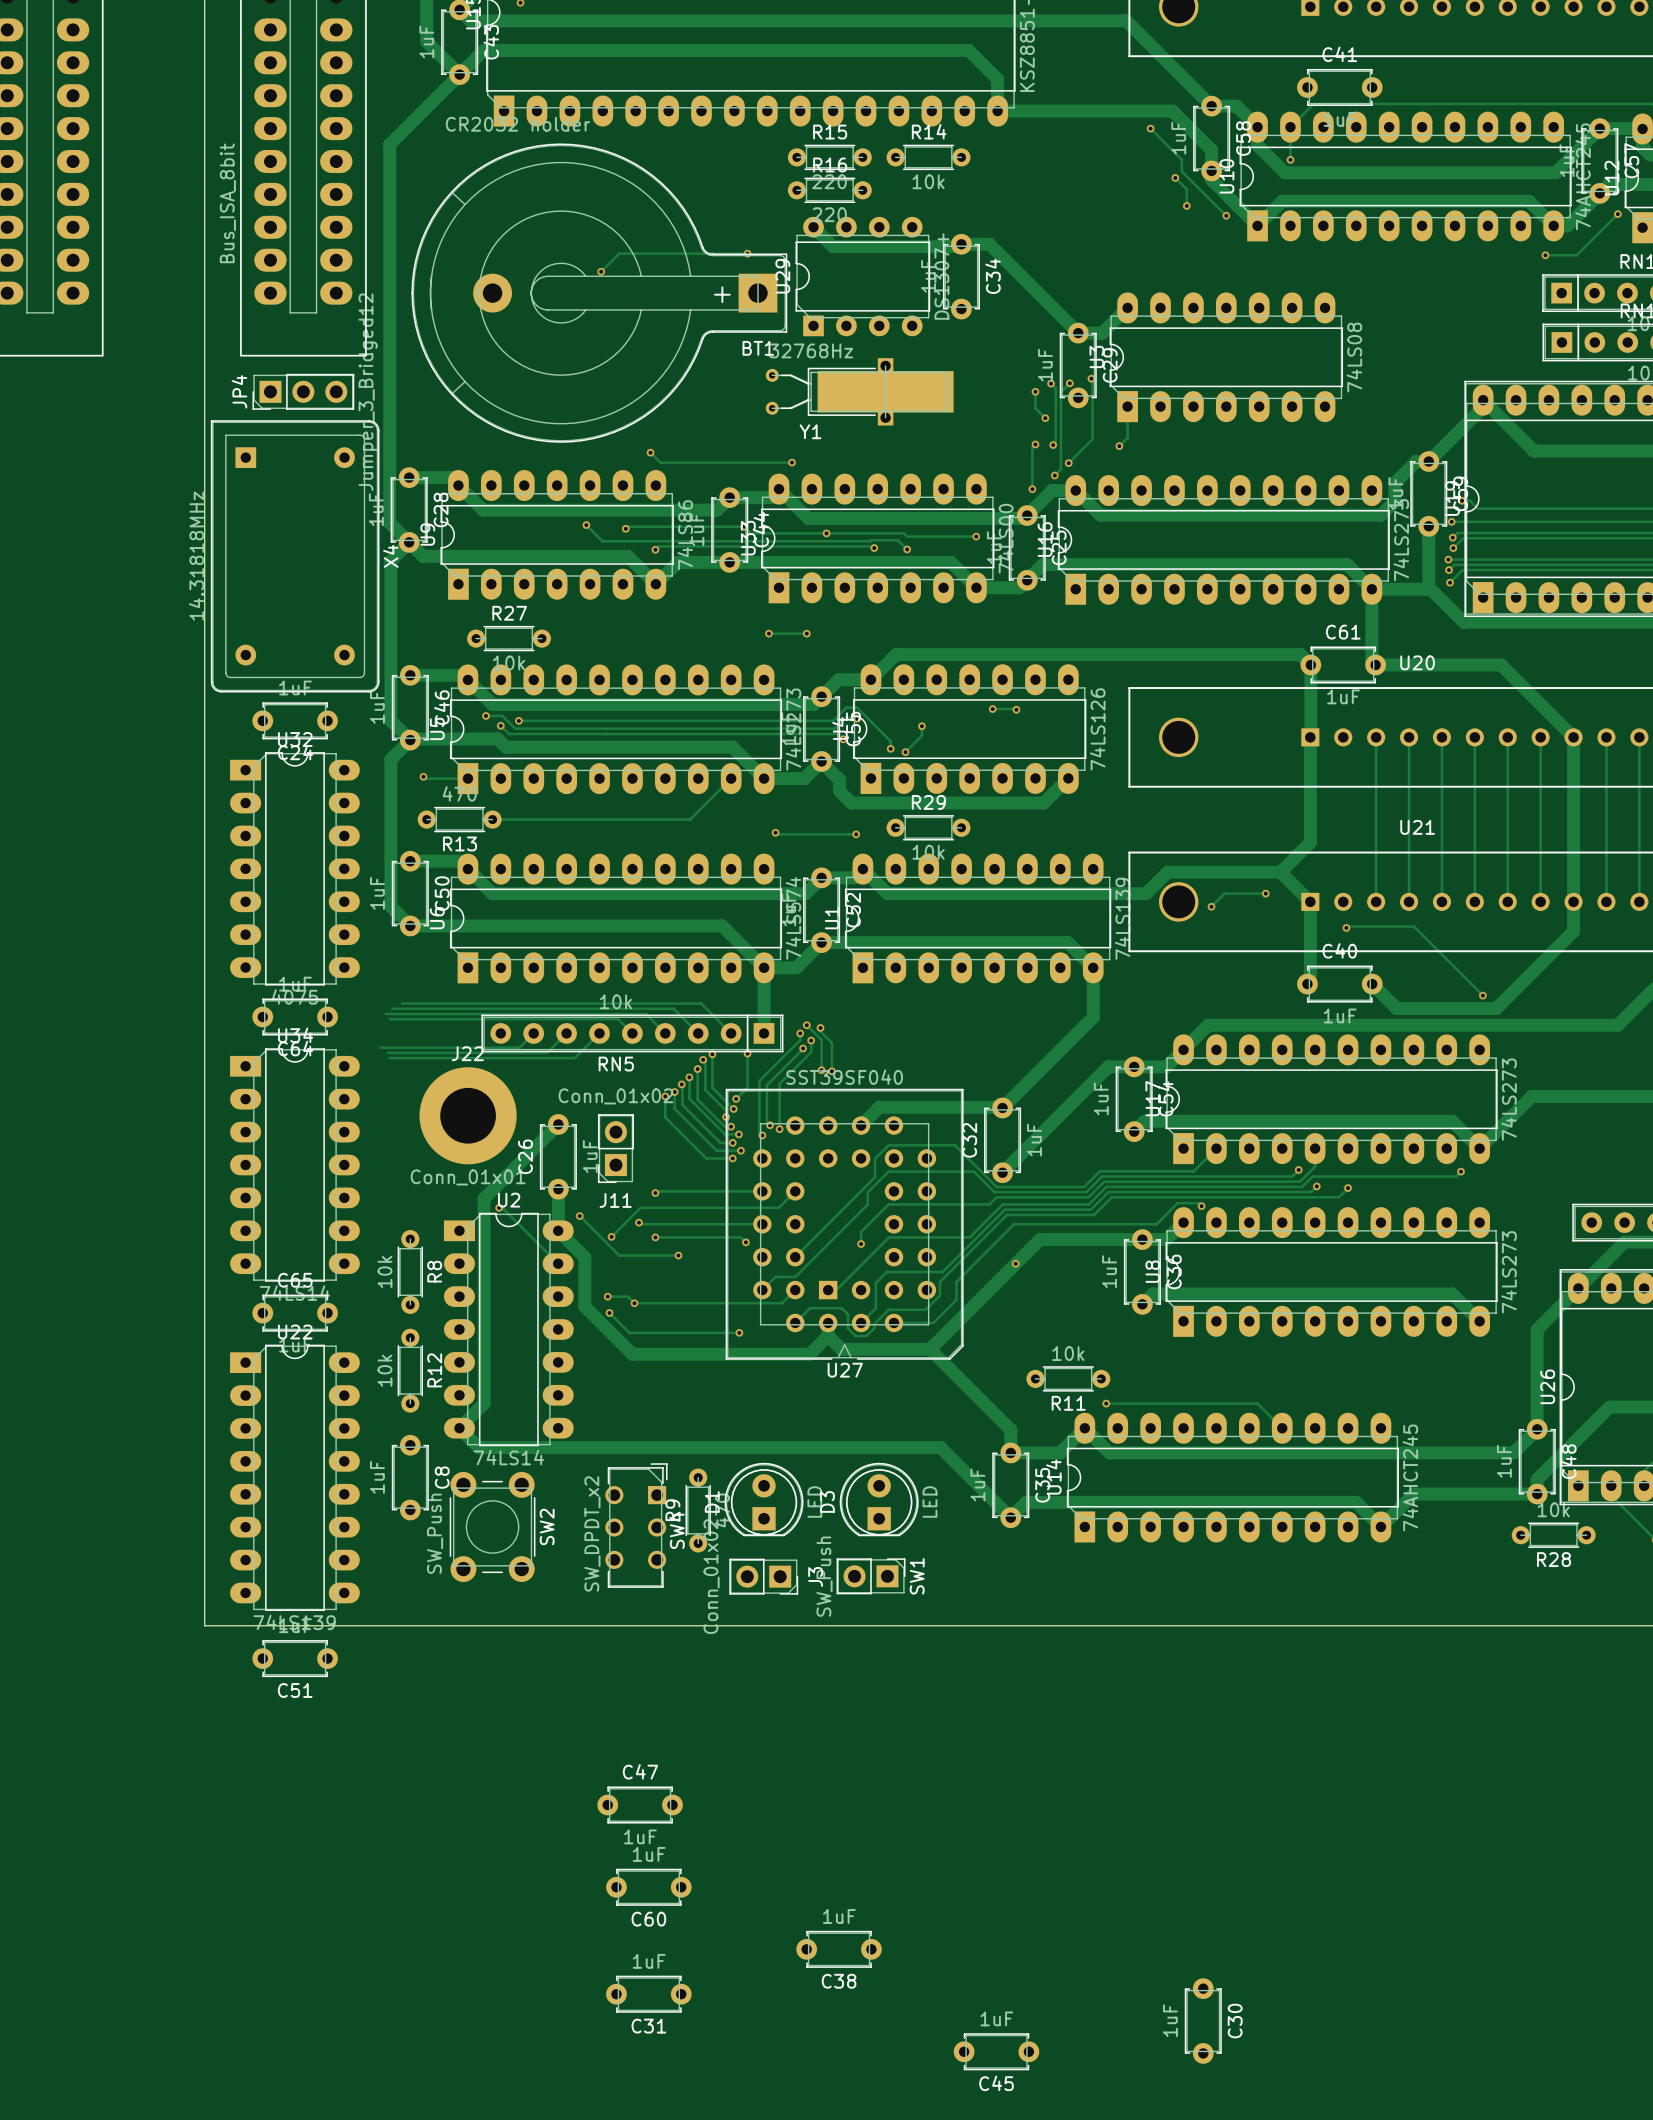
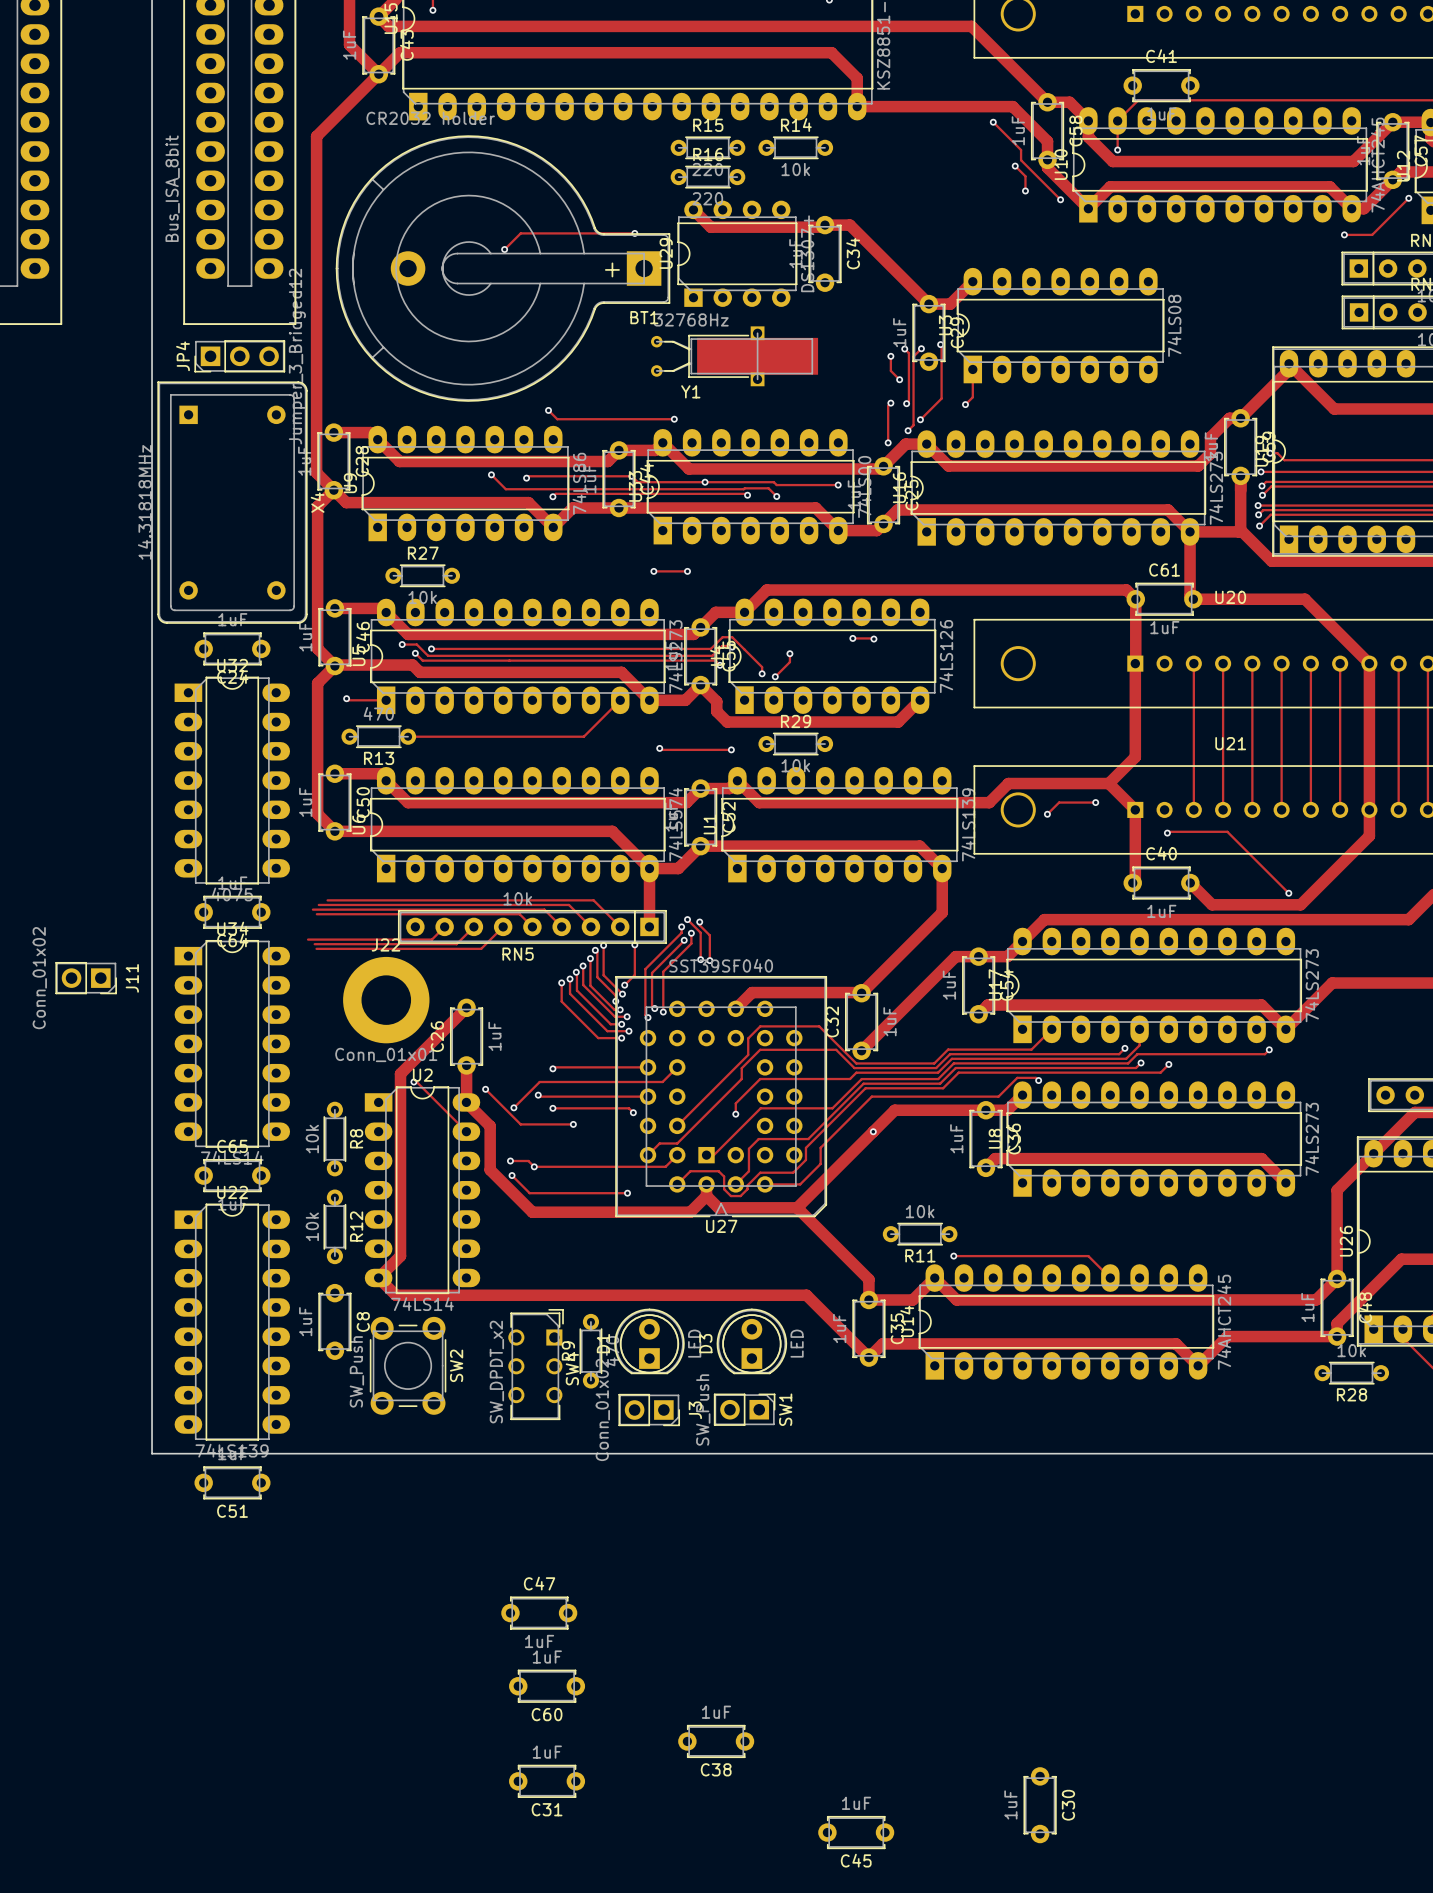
J11 rotation: 0° (615, 1148) -> 90° counterclockwise (86, 978)
J11 position: (615, 1148) -> (86, 978)

